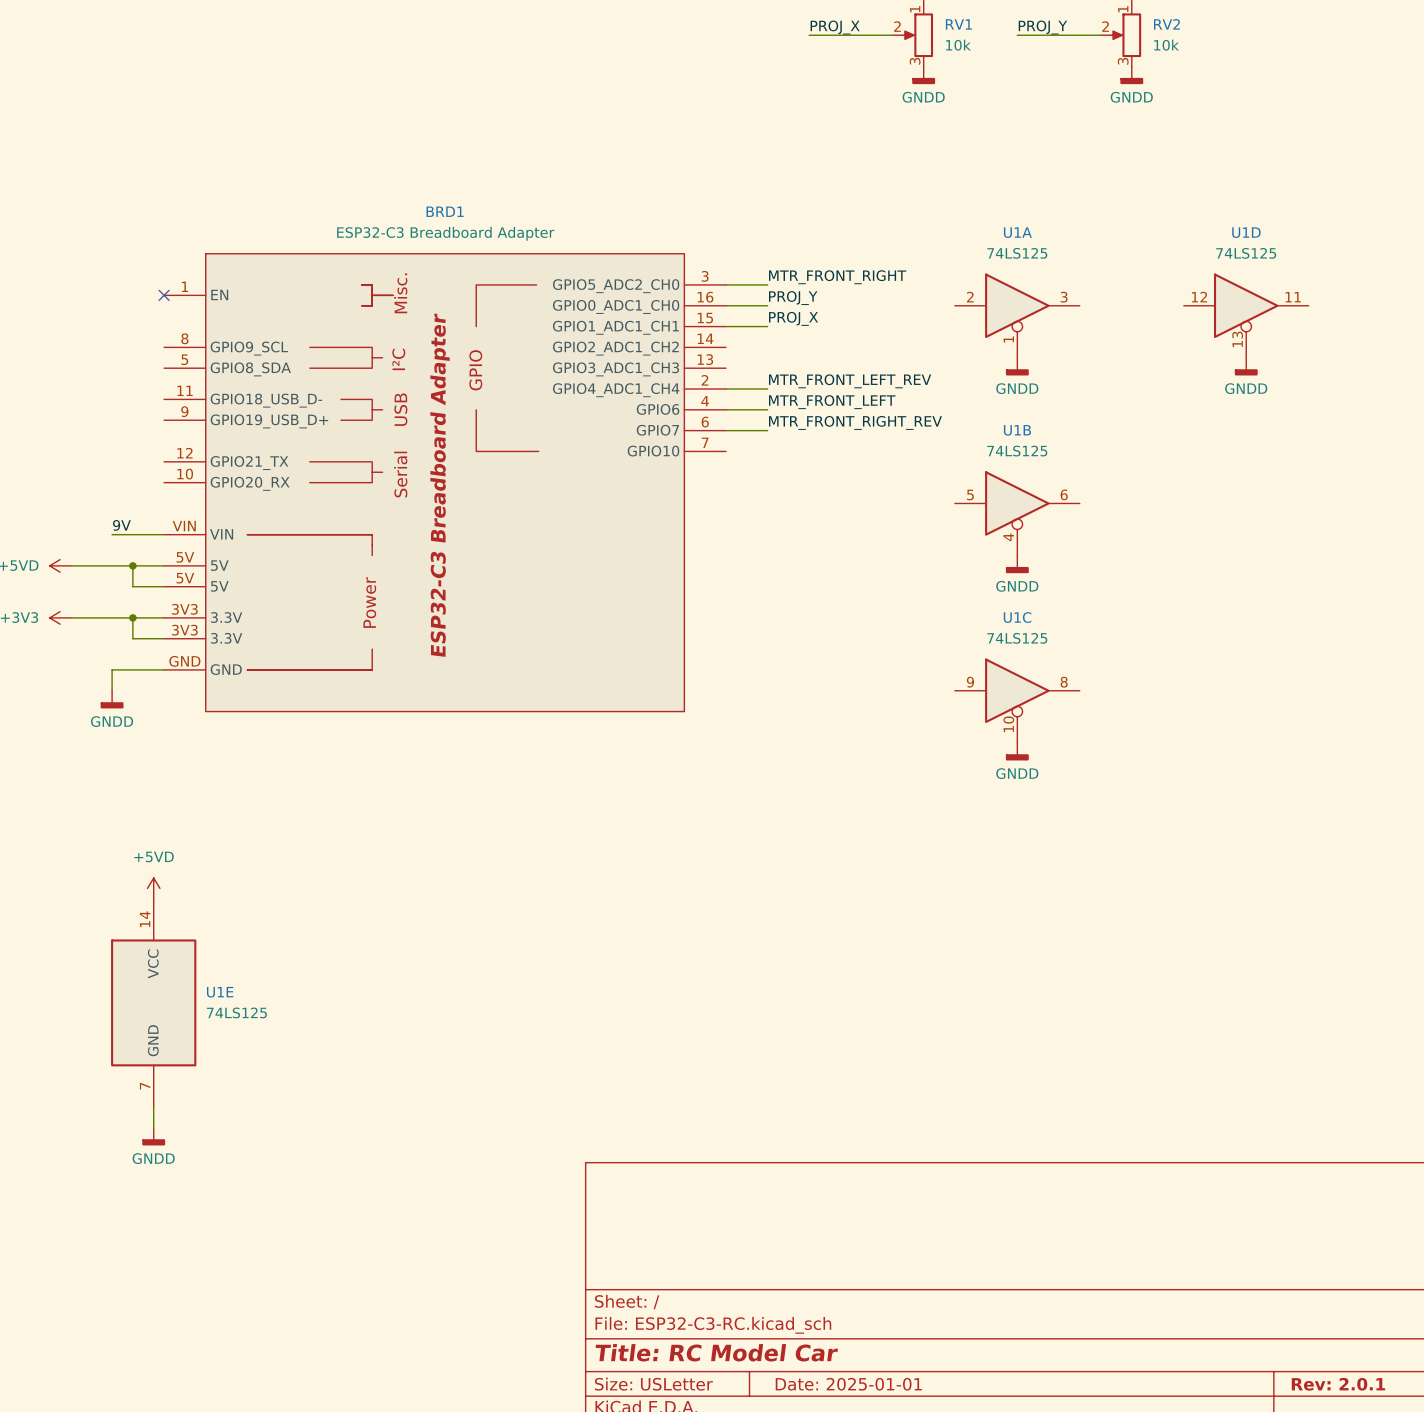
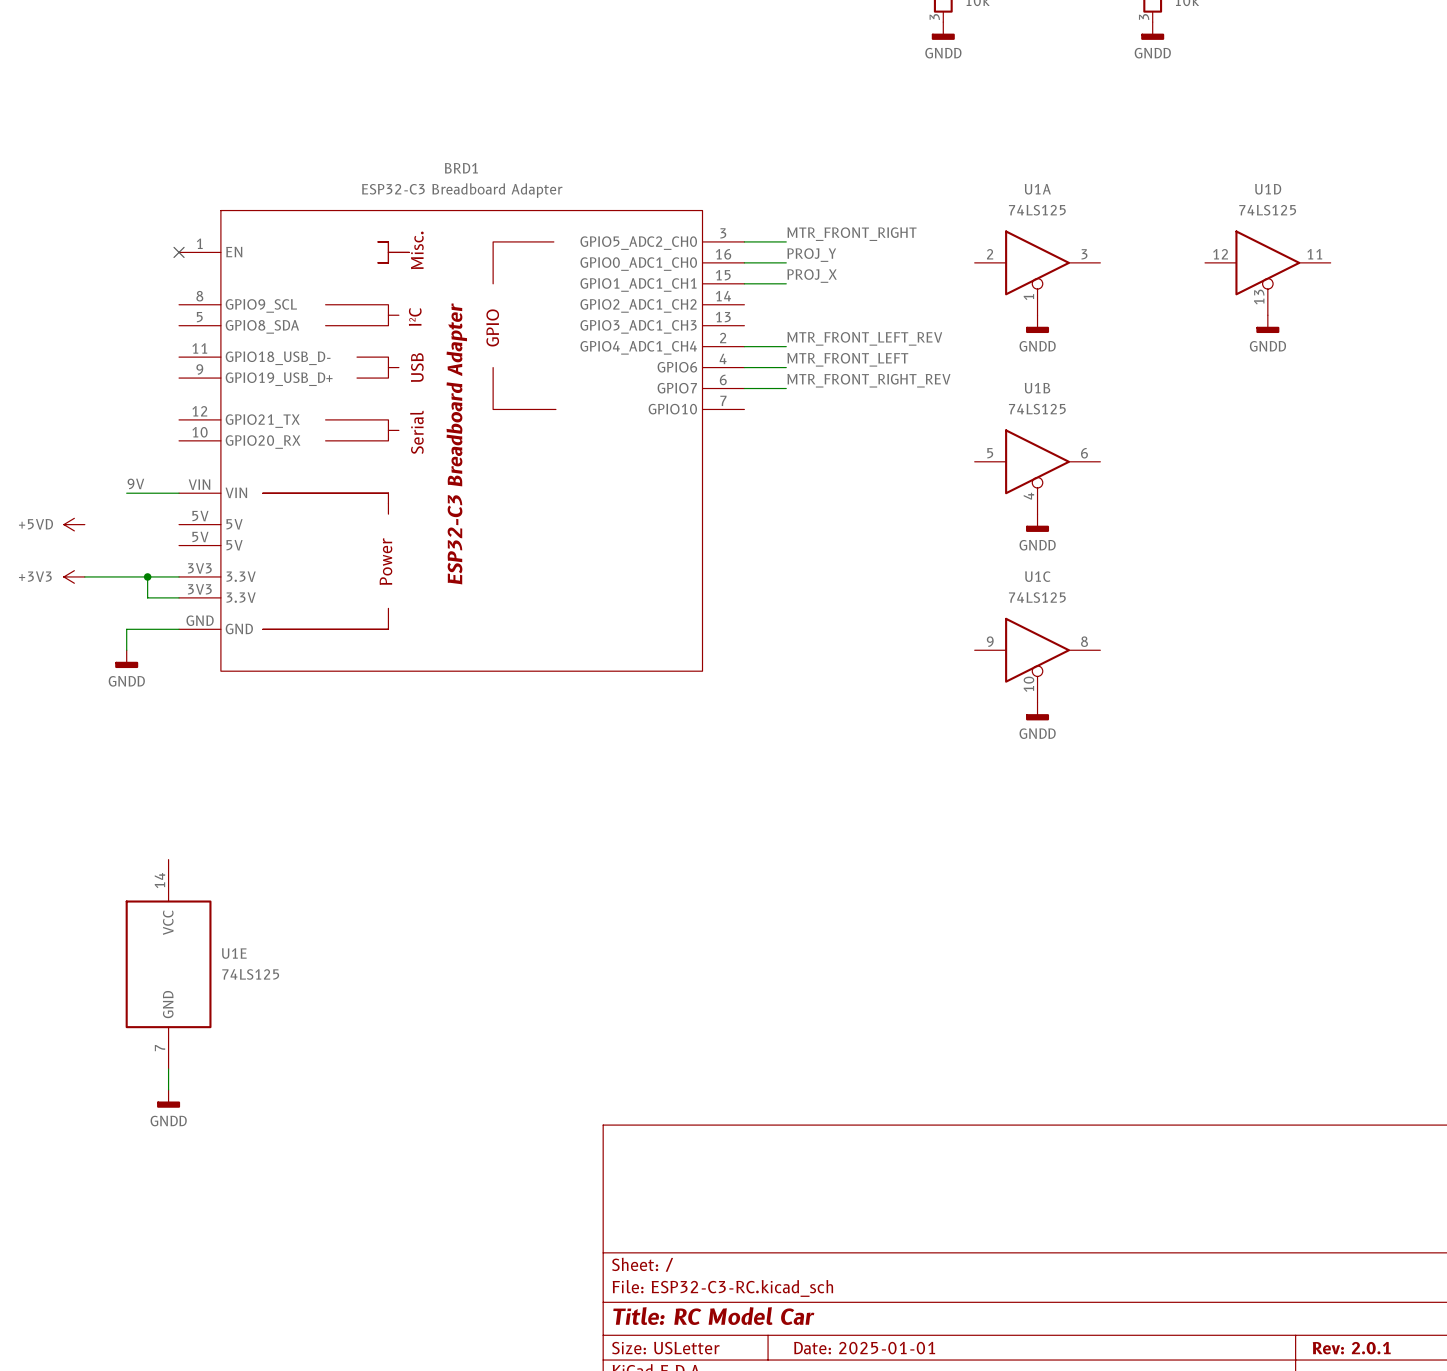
wire: (70, 565) (164, 565) -> none
wire: (132, 565) (132, 586) (164, 586) -> none
junction: (132, 565) -> none
power symbol: +5VD (153, 888) -> none

